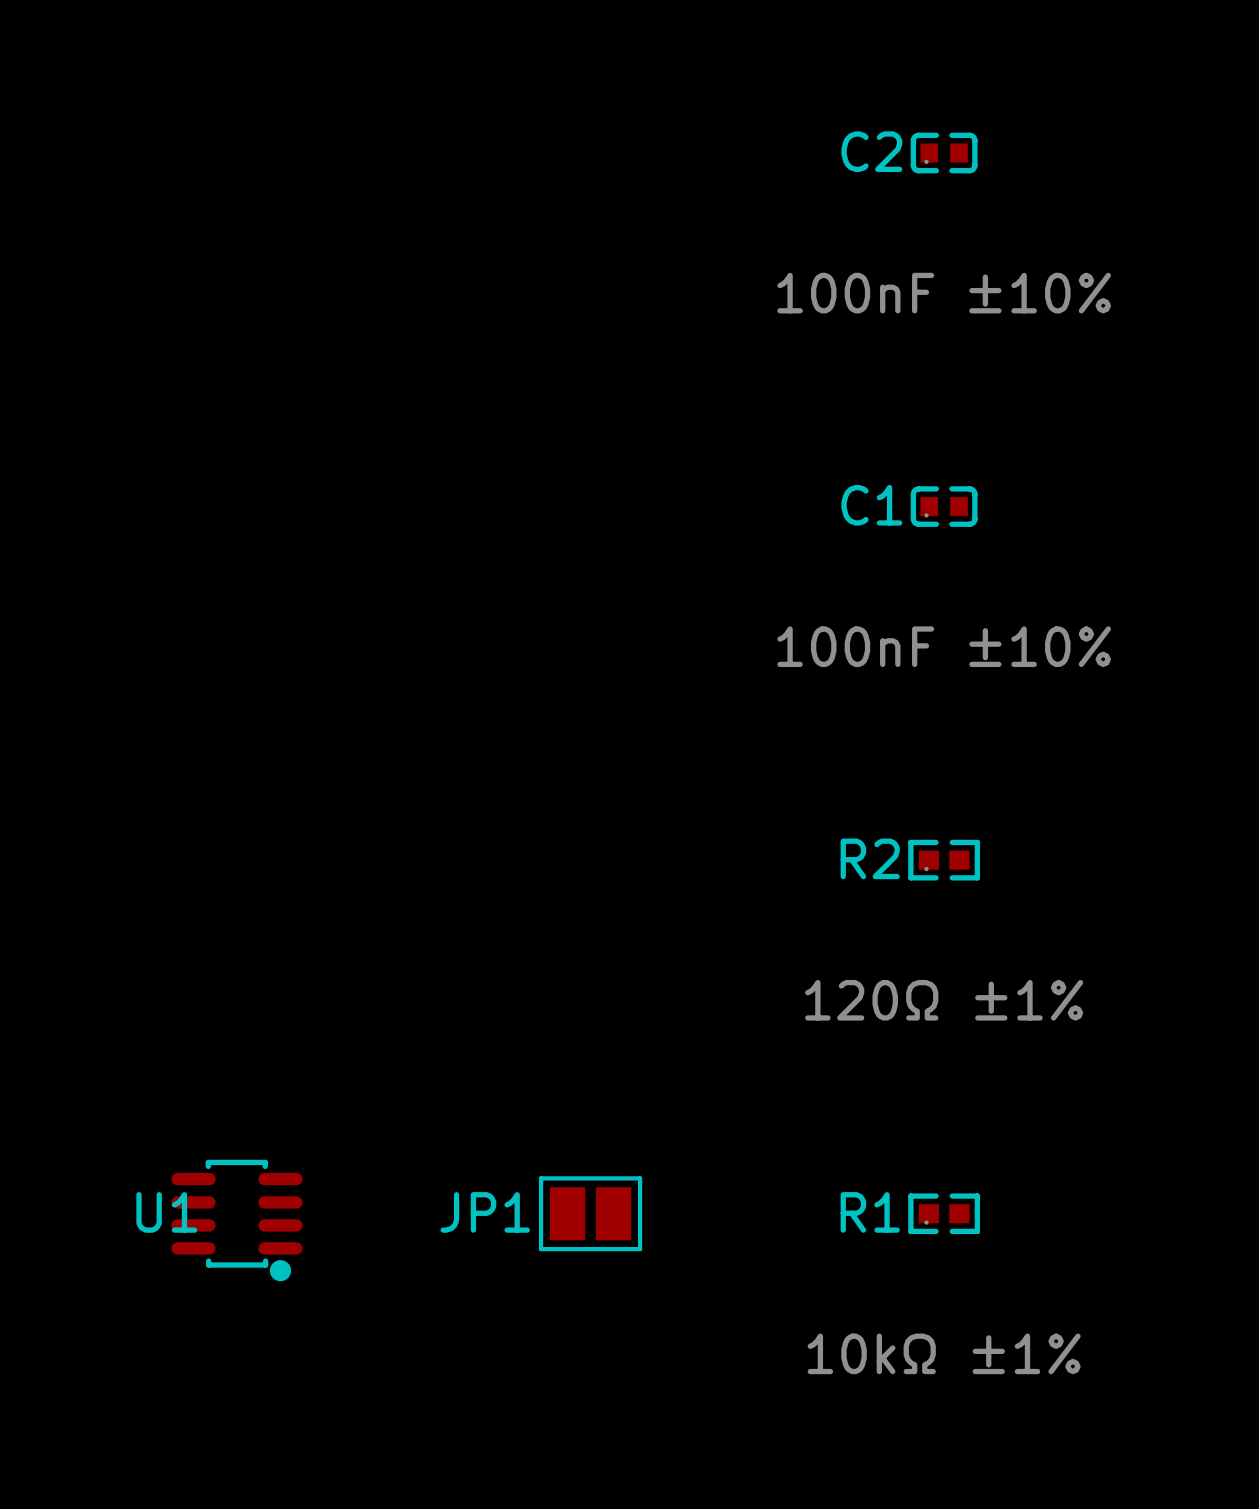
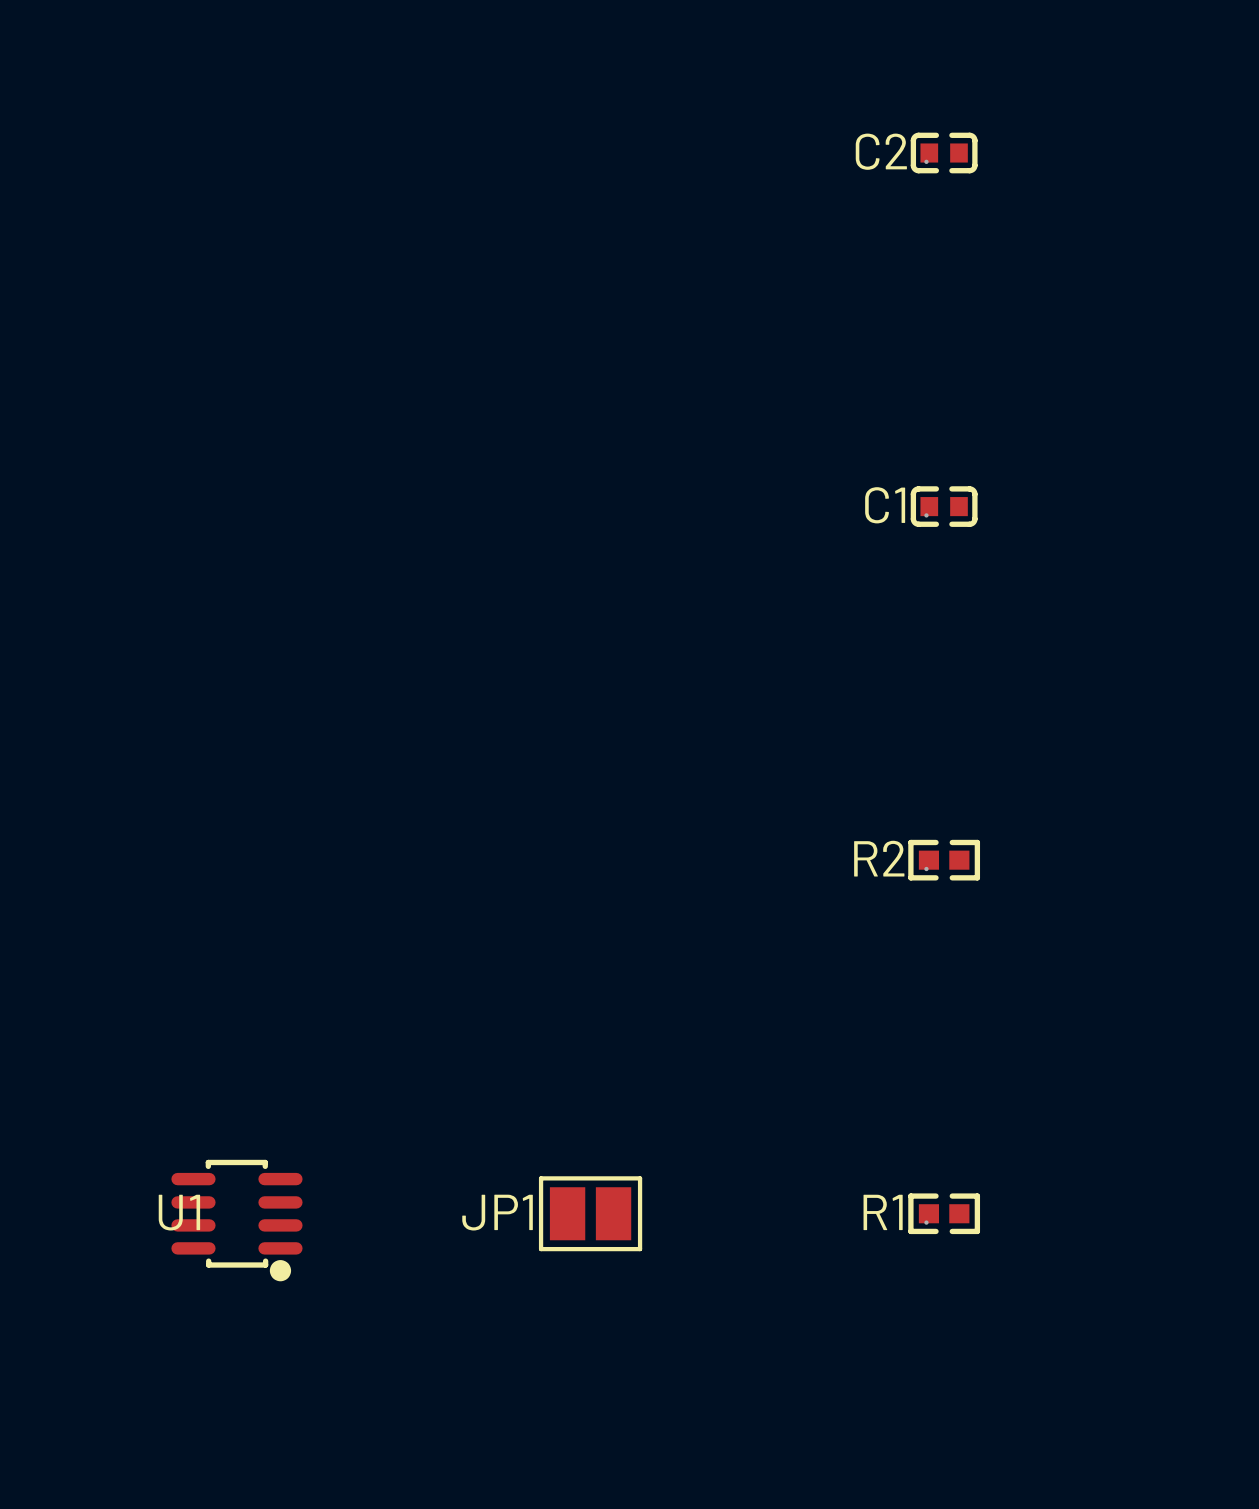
C2 value: 100nF ±10% (944, 293) -> none
C1 value: 100nF ±10% (944, 646) -> none
R2 value: 120Ω ±1% (944, 1000) -> none
R1 value: 10kΩ ±1% (944, 1353) -> none

